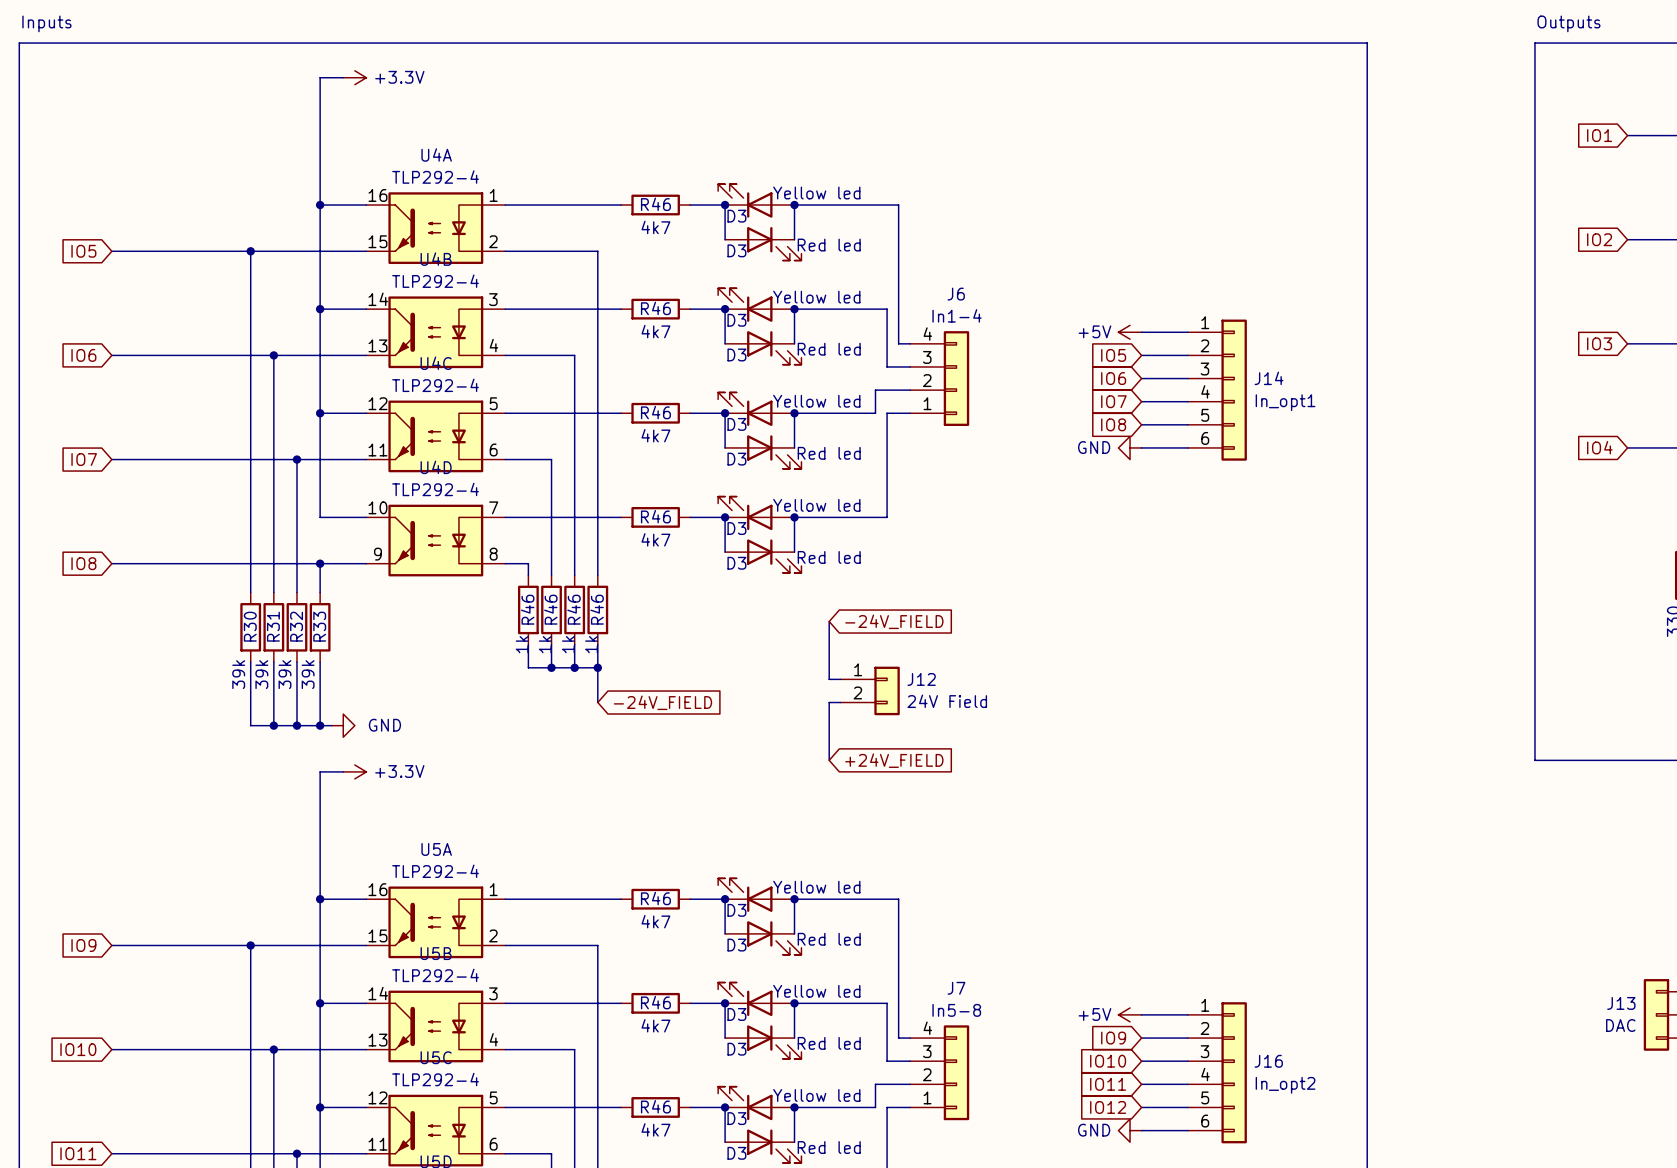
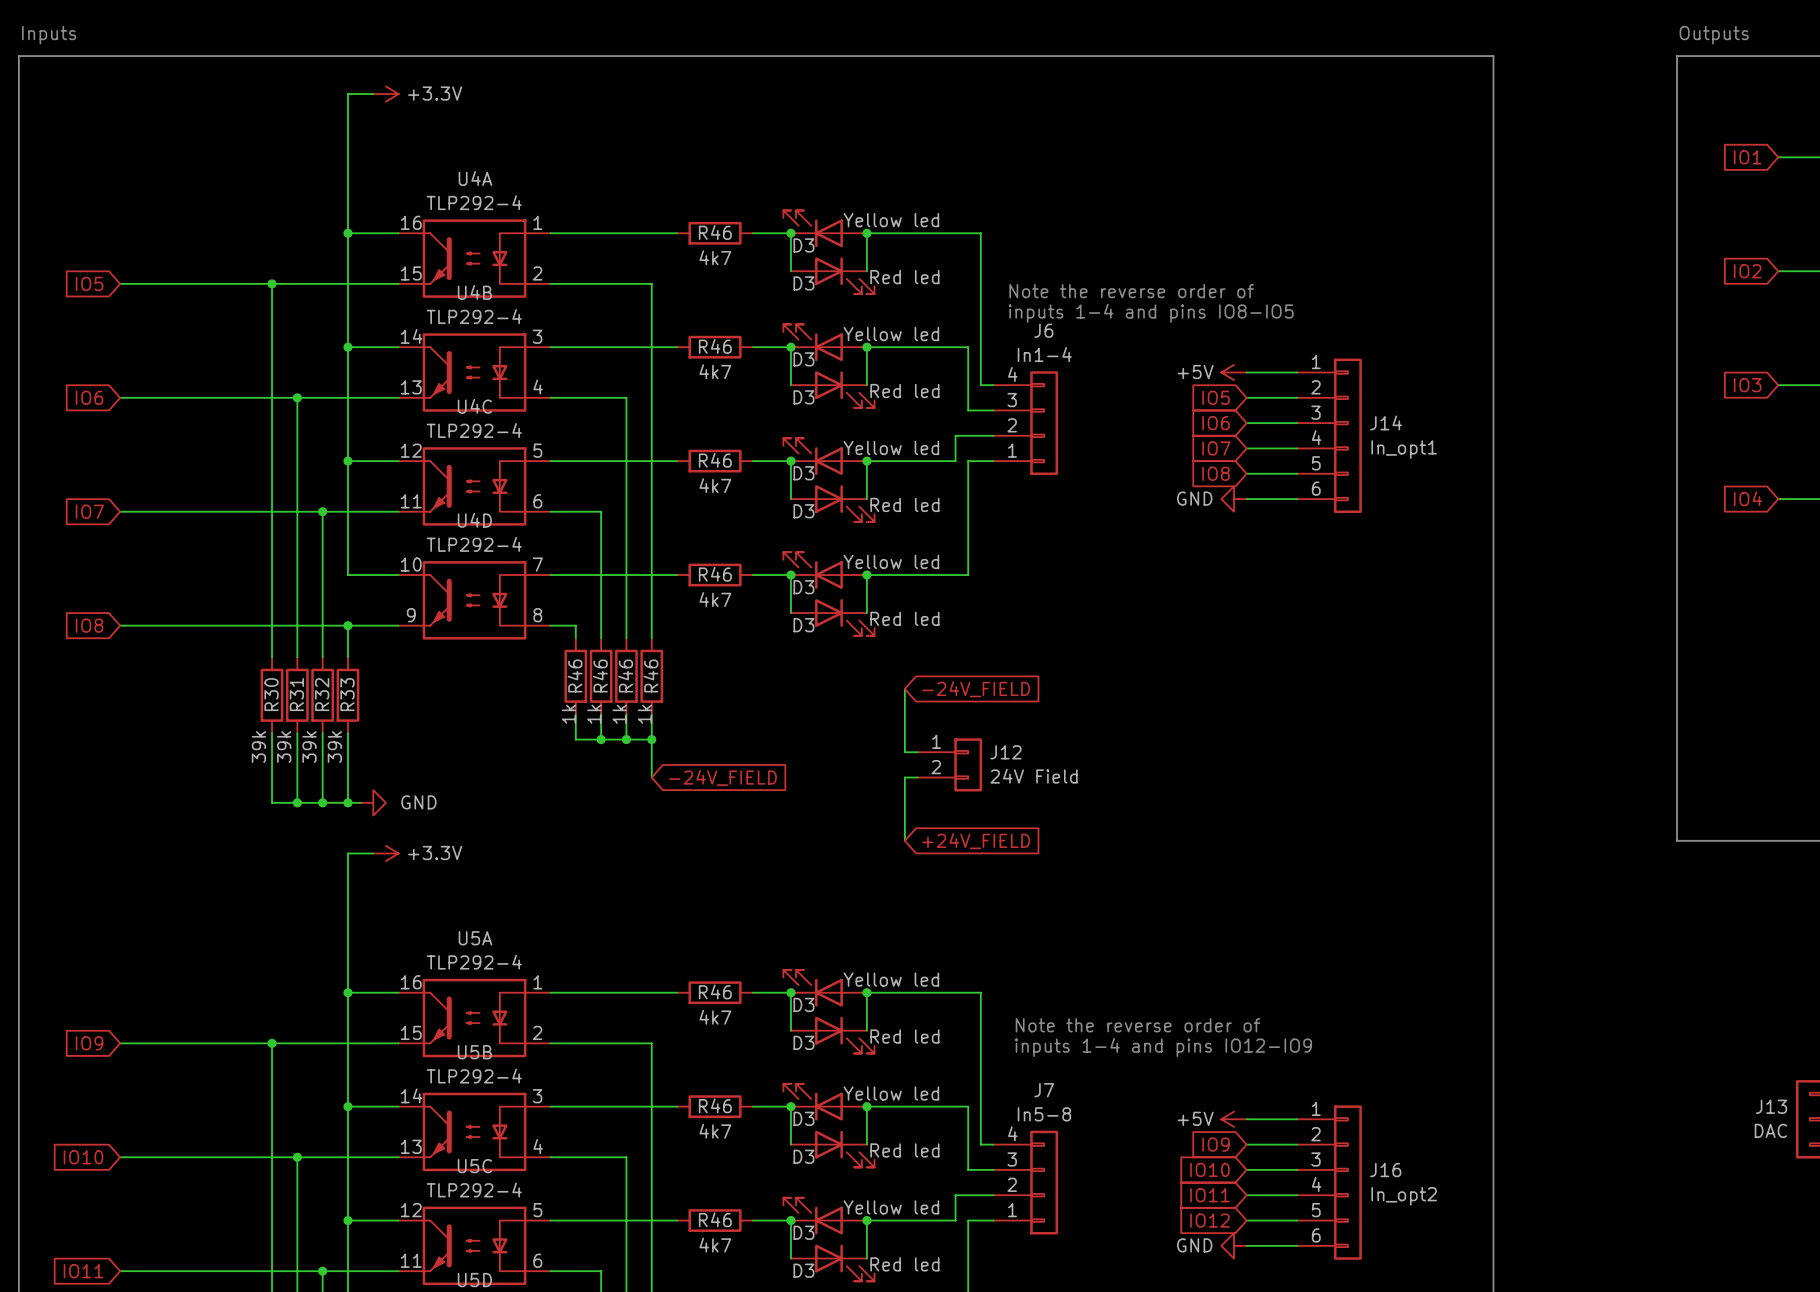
text: none -> Note the reverse order of (1131, 291)
text: none -> inputs 1-4 and pins IO8-IO5 (1151, 313)
text: none -> Note the reverse order of (1137, 1025)
text: none -> inputs 1-4 and pins IO12-IO9 (1163, 1047)

